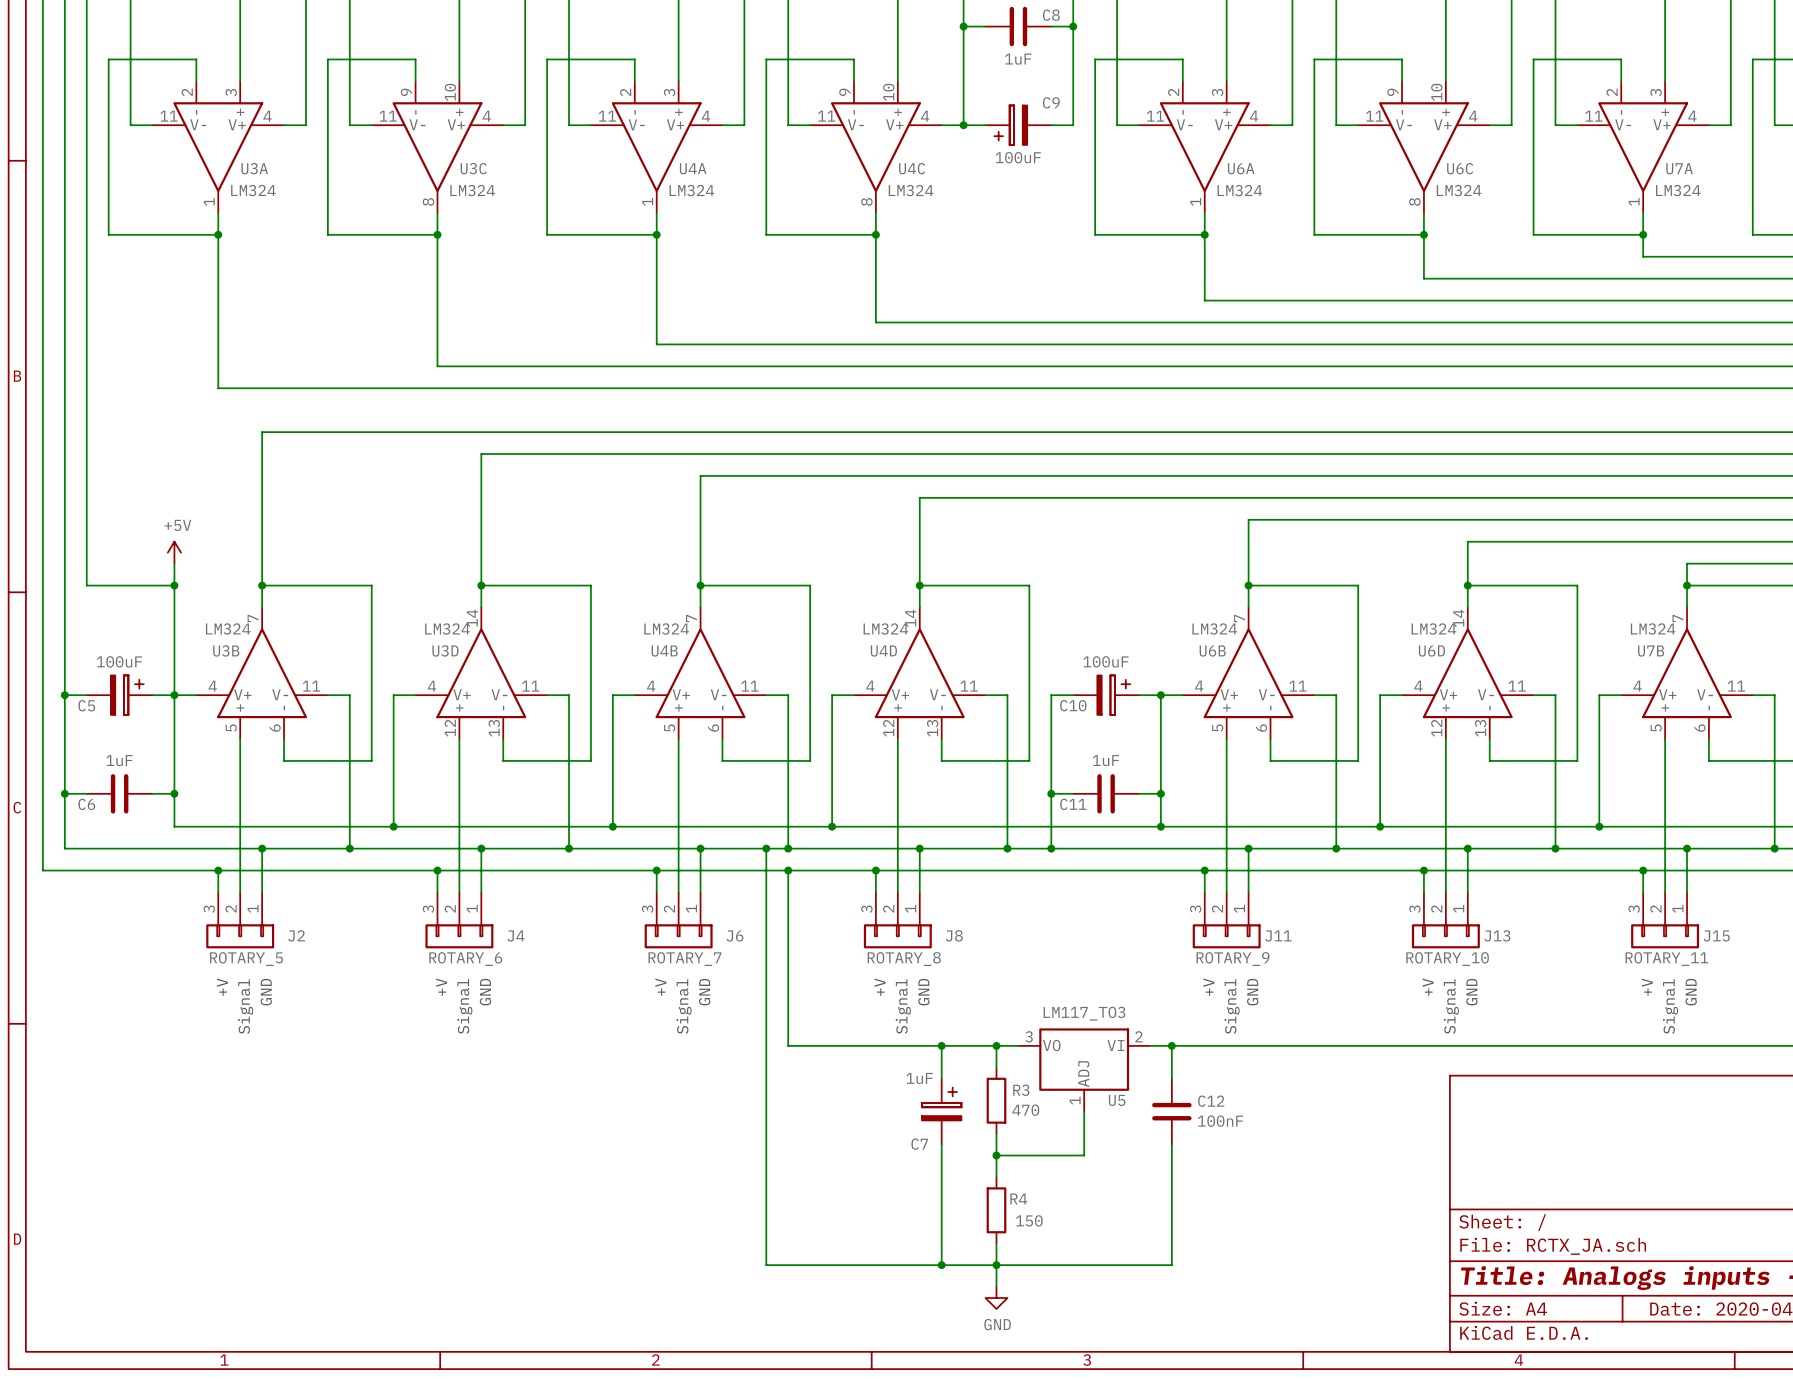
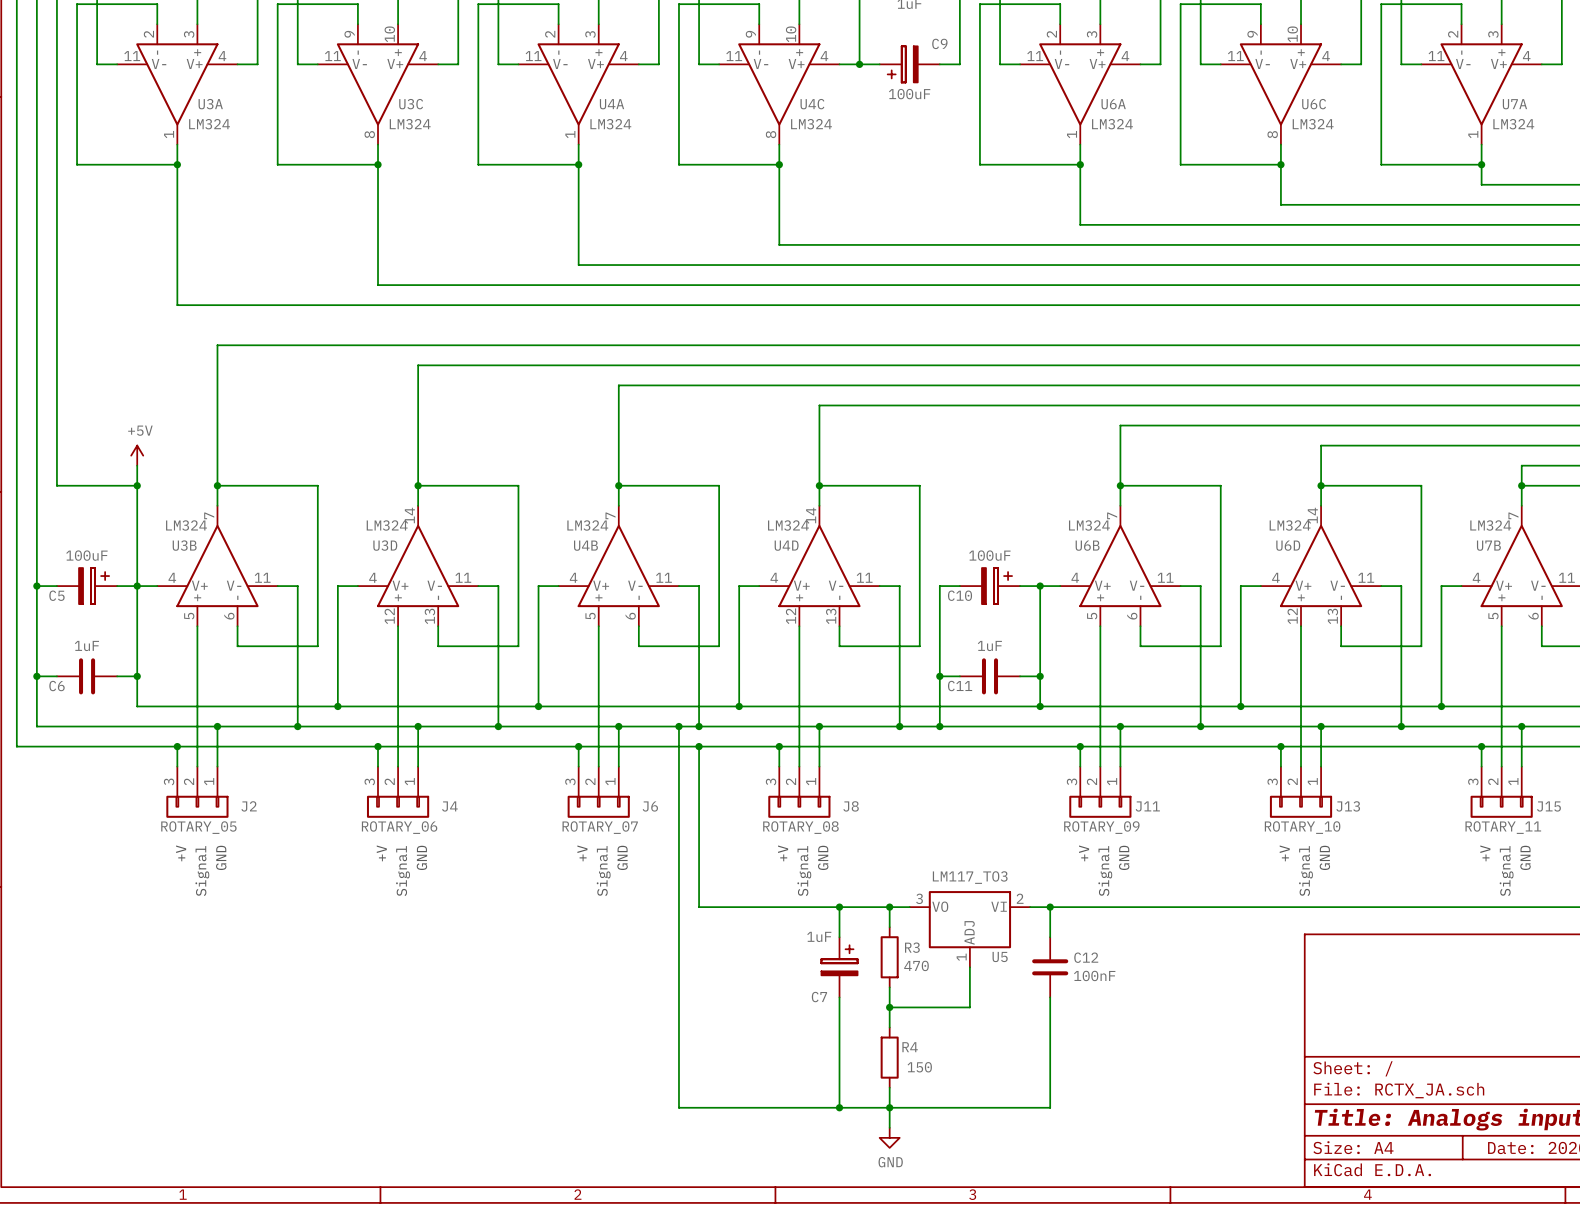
J2 value: ROTARY_5 (246, 959) -> ROTARY_05 (198, 827)
J4 value: ROTARY_6 (465, 959) -> ROTARY_06 (399, 827)
J6 value: ROTARY_7 (684, 959) -> ROTARY_07 (600, 827)
J8 value: ROTARY_8 (904, 959) -> ROTARY_08 (800, 827)
J11 value: ROTARY_9 (1233, 959) -> ROTARY_09 (1101, 827)

